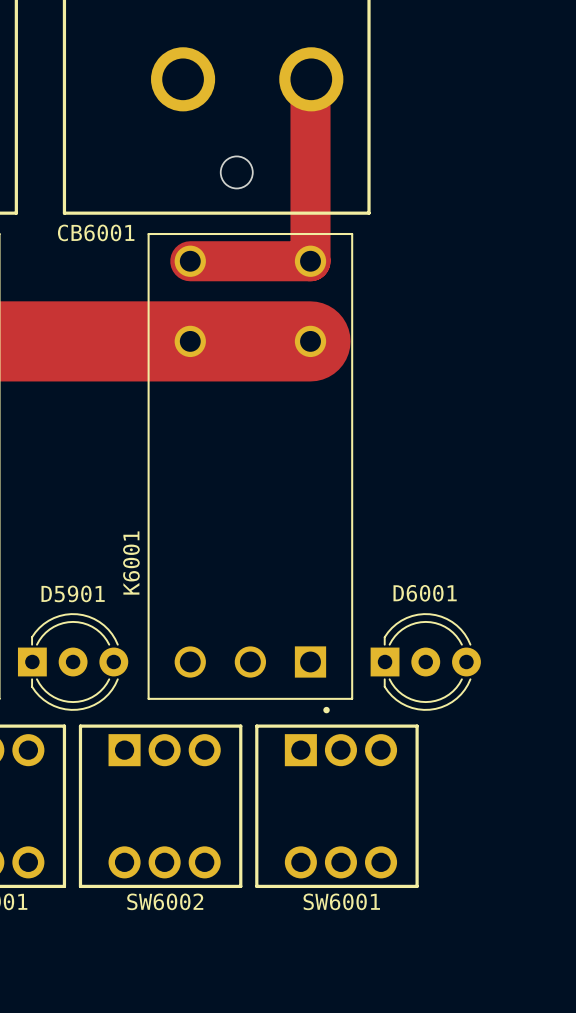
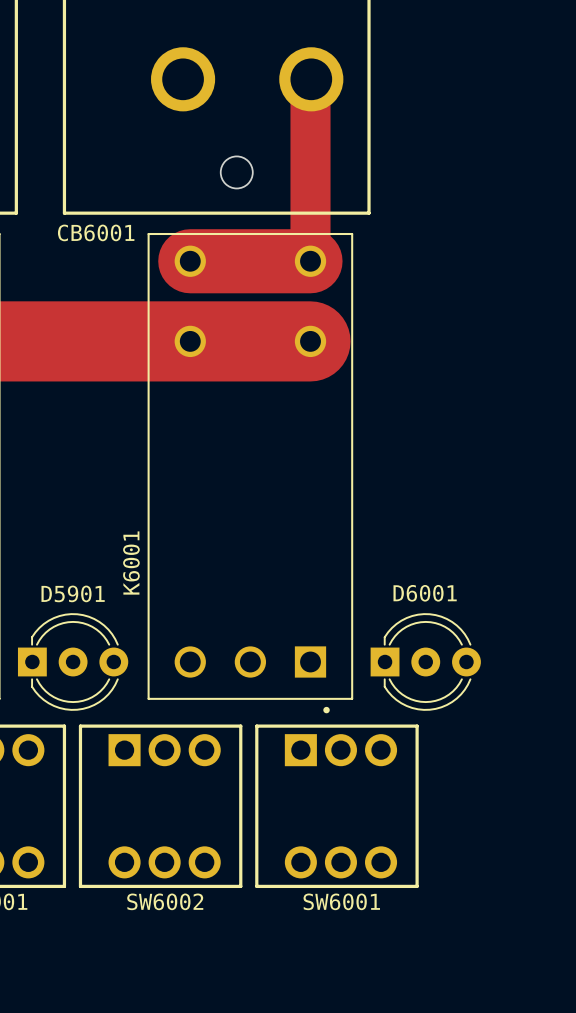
track width: thin (190, 261) (310, 261) -> thick (190, 261) (310, 261)

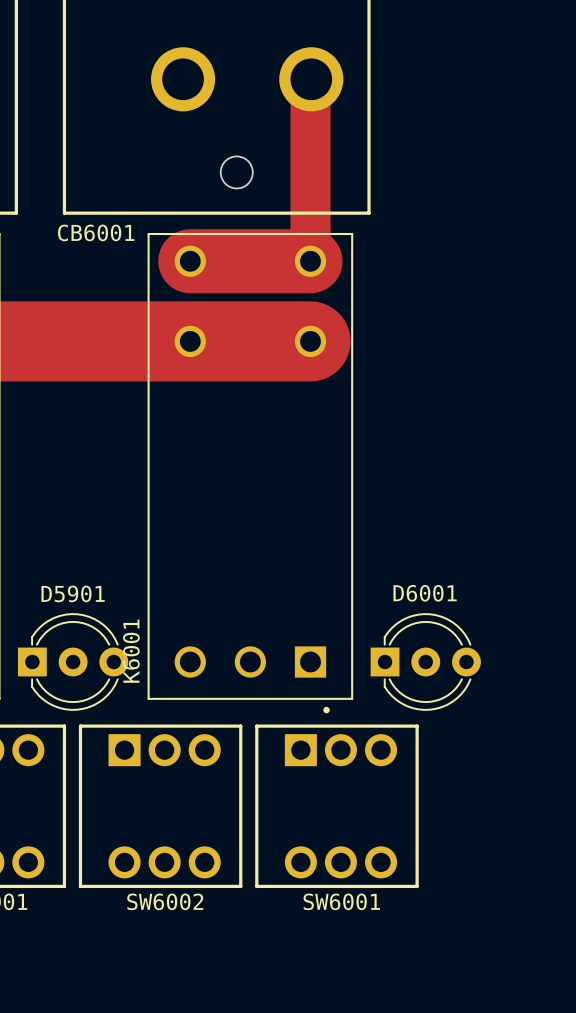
K6001 name position: K6001 (131, 563) -> K6001 (131, 651)

